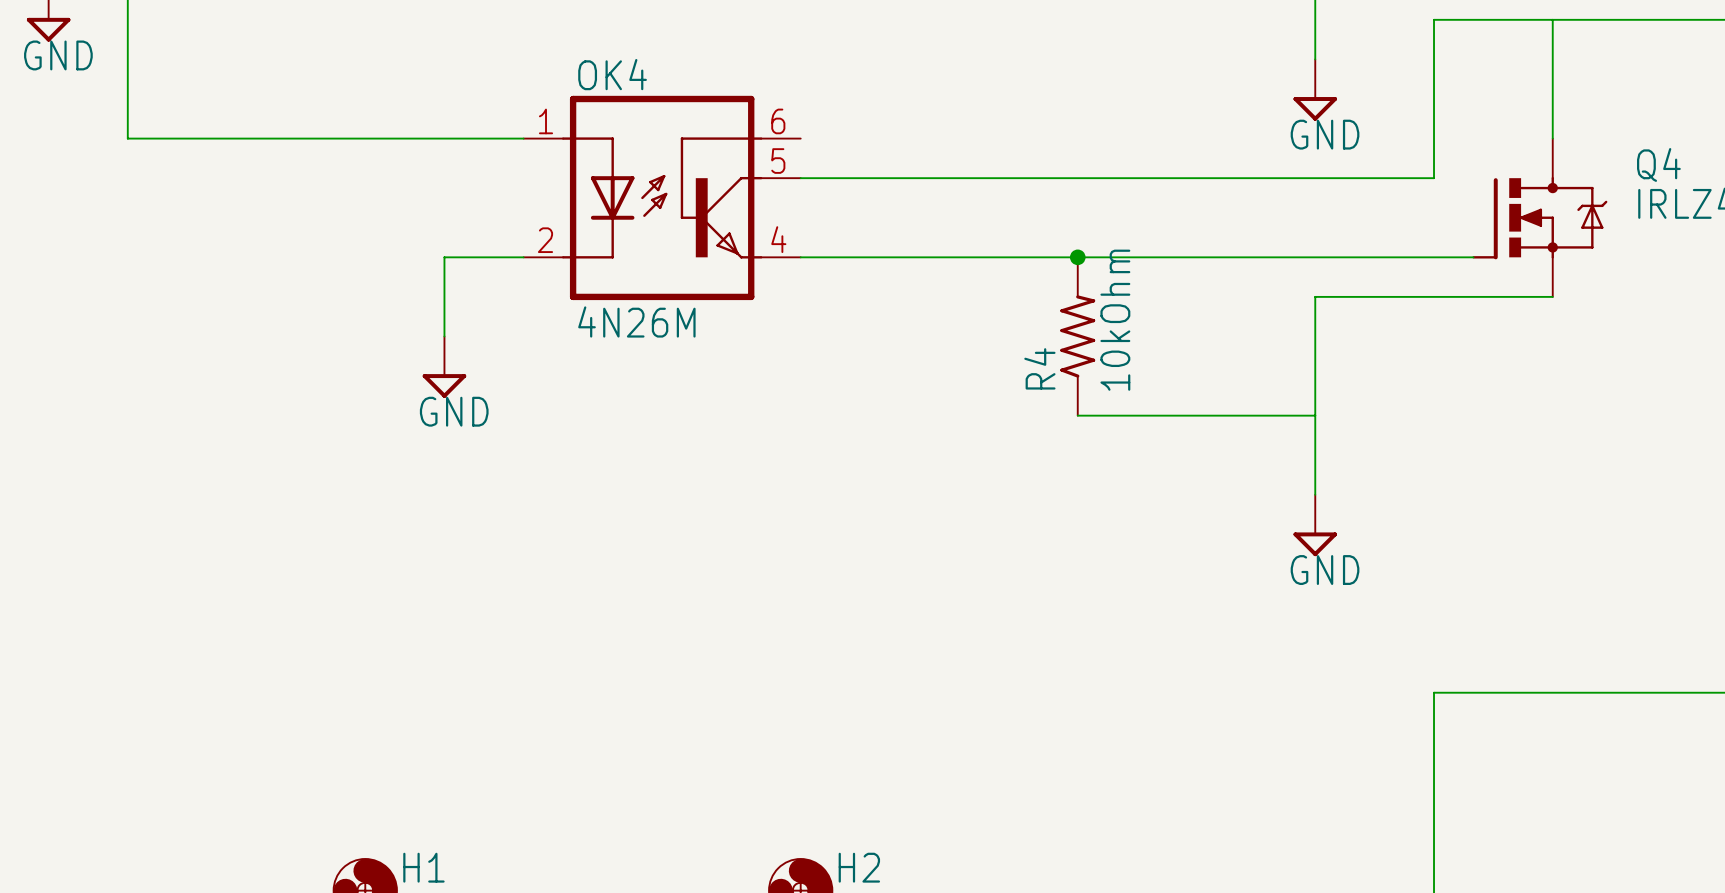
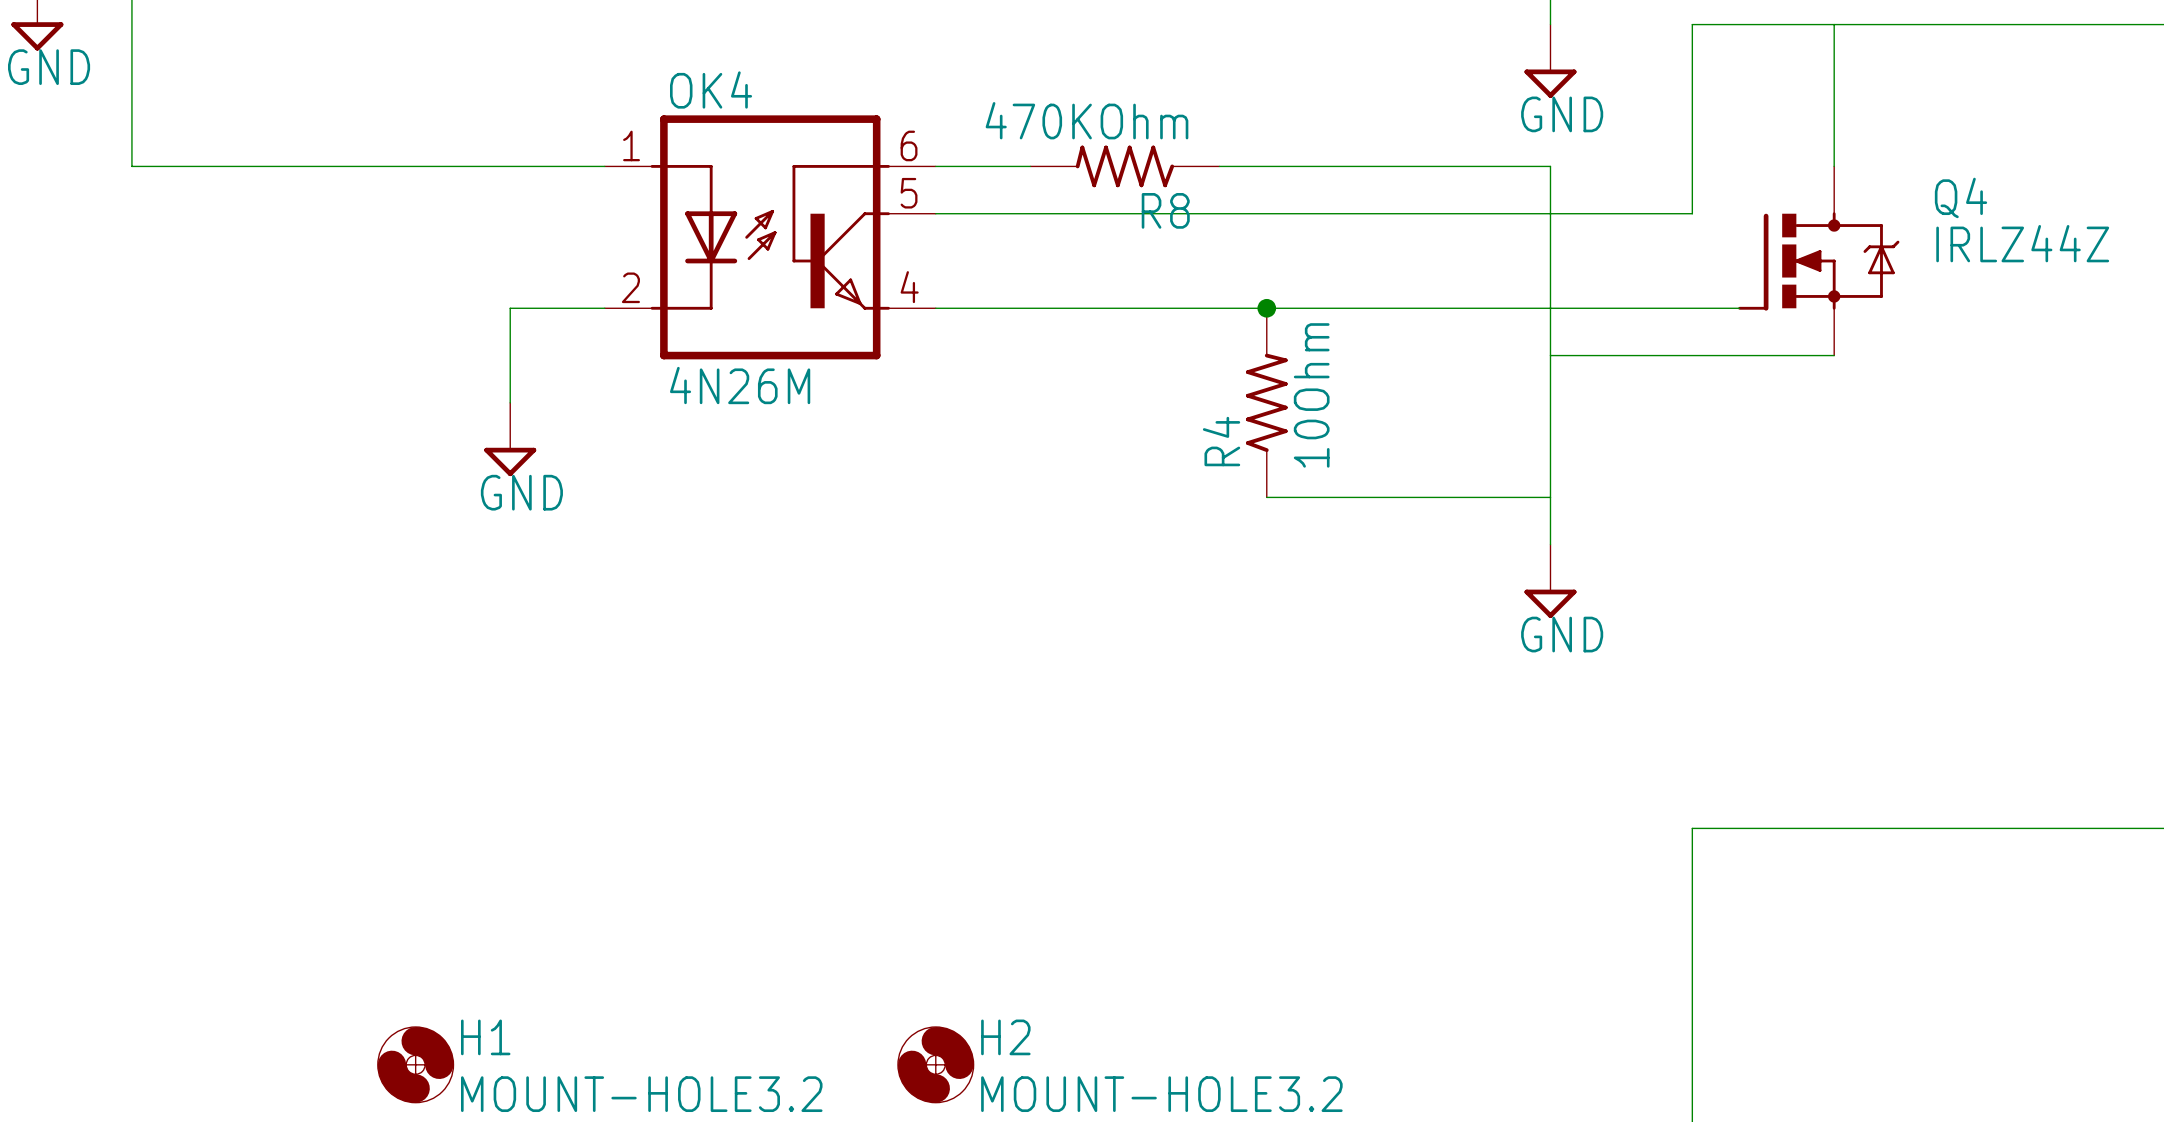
power symbol position: GND (1315, 90) -> GND (1550, 61)
wire: none -> (935, 166) (1030, 166)
R8: none -> 470KOhm (1124, 166)
wire: none -> (1219, 166) (1550, 166) (1550, 355)
R4 value: 10kOhm (1115, 320) -> 10Ohm (1311, 395)
power symbol position: GND (1315, 525) -> GND (1550, 581)

